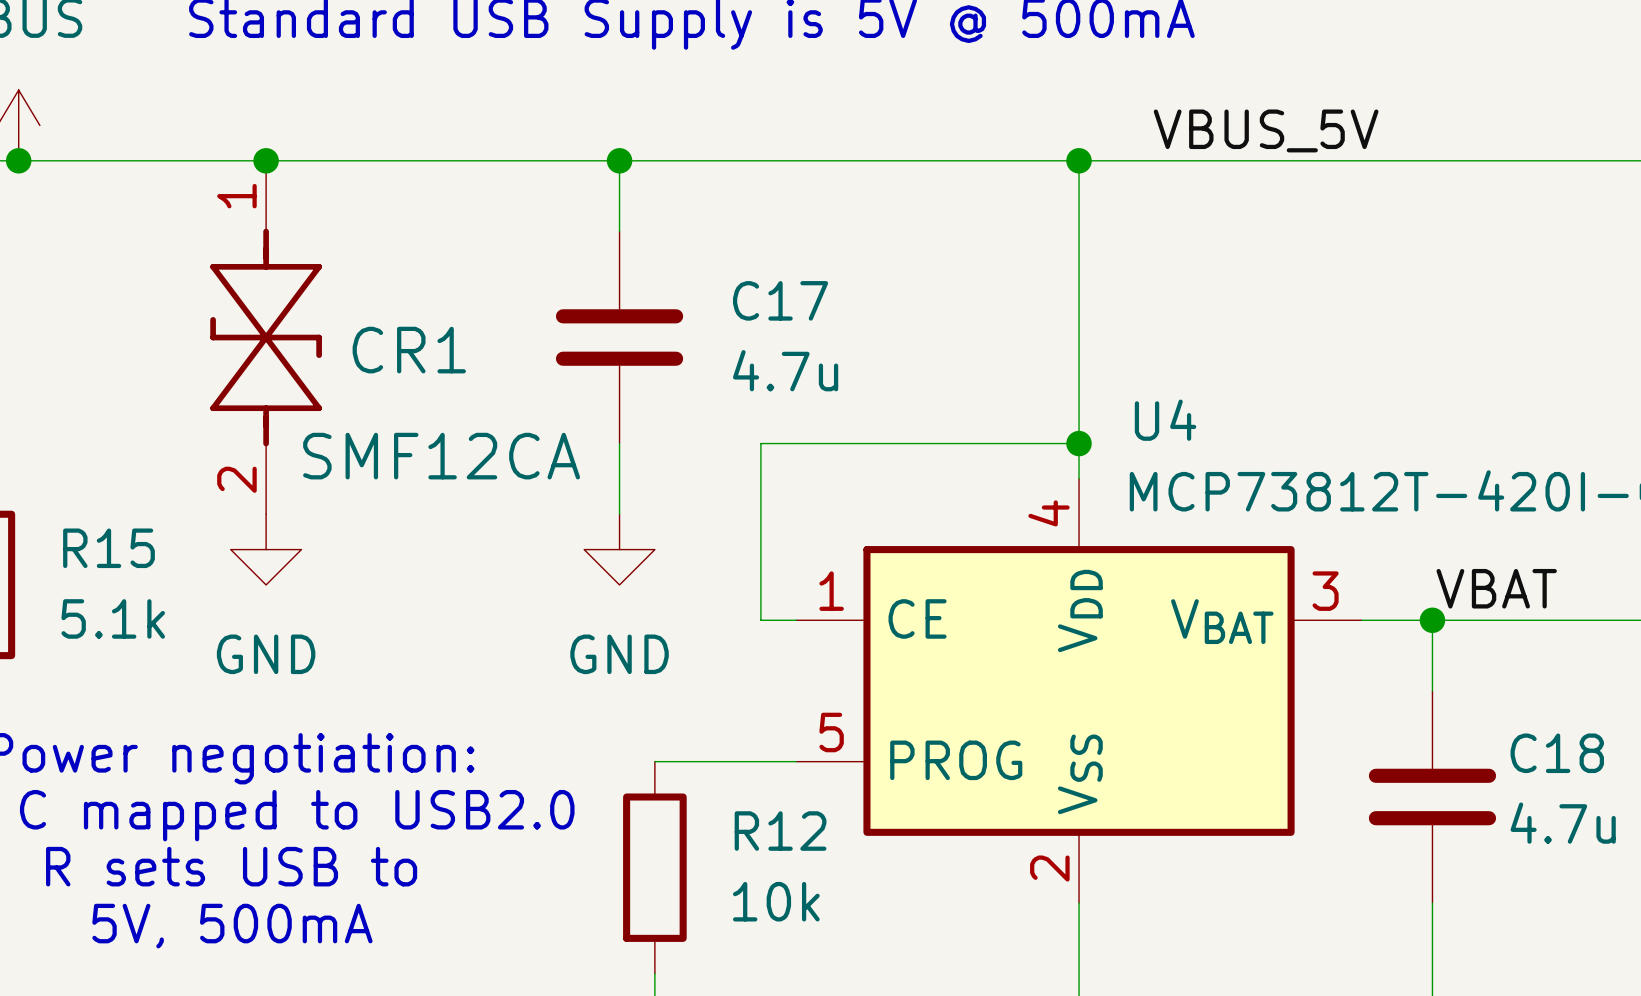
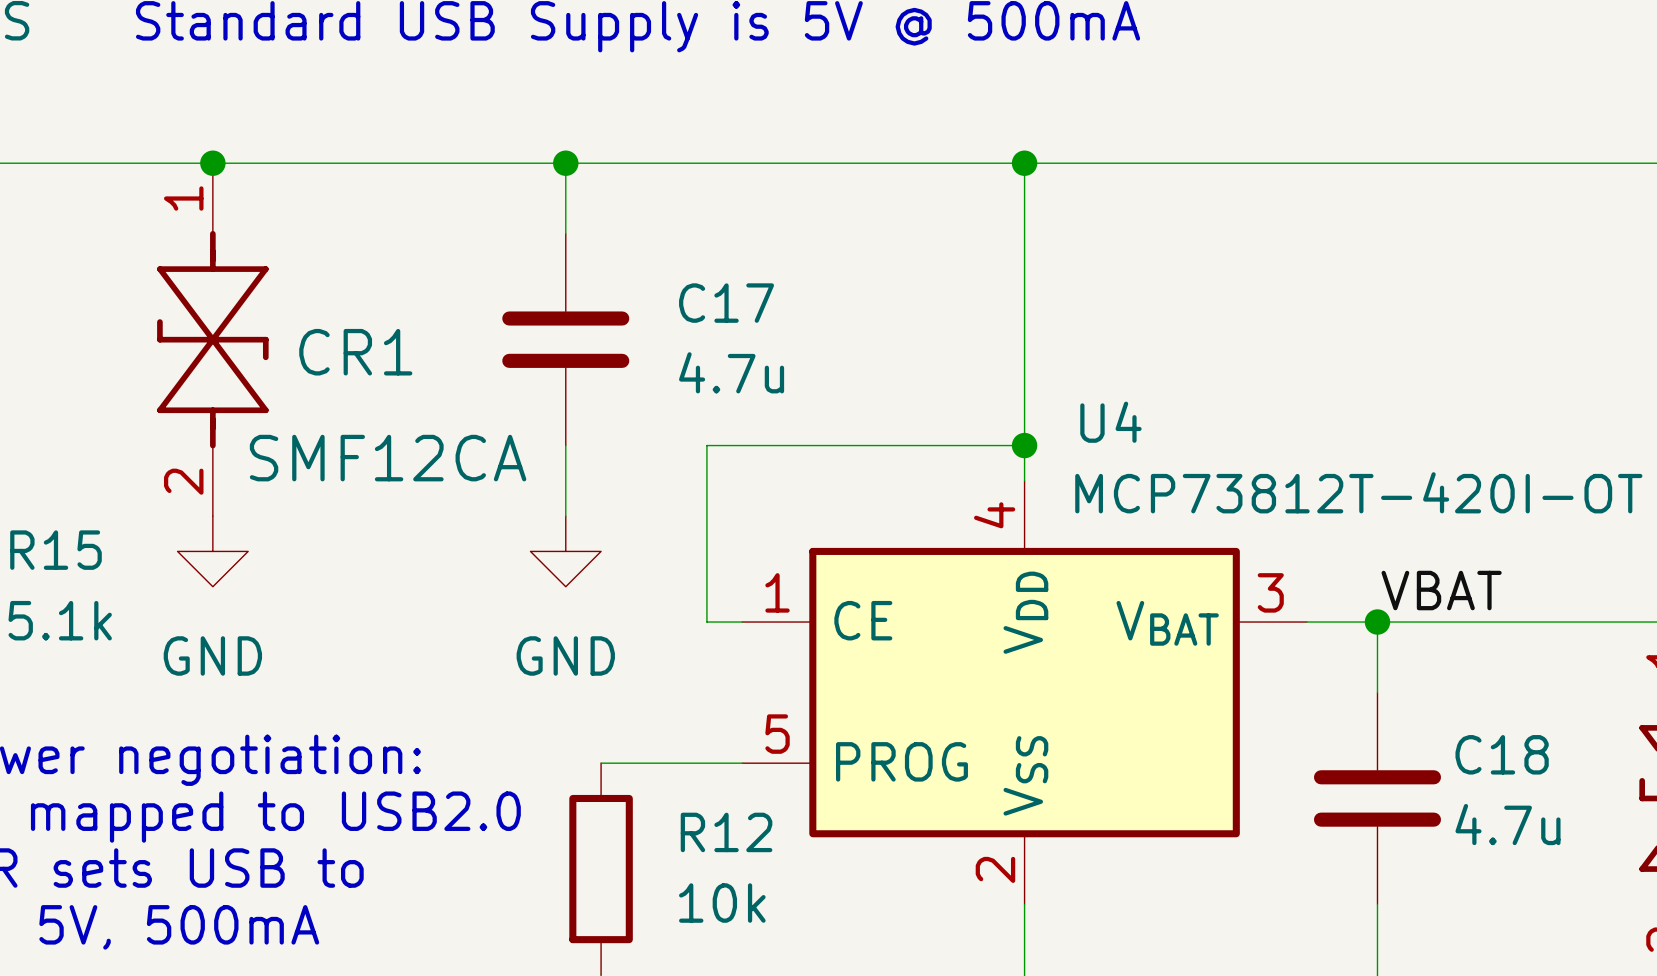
label: VBUS_5V (1266, 130) -> none

